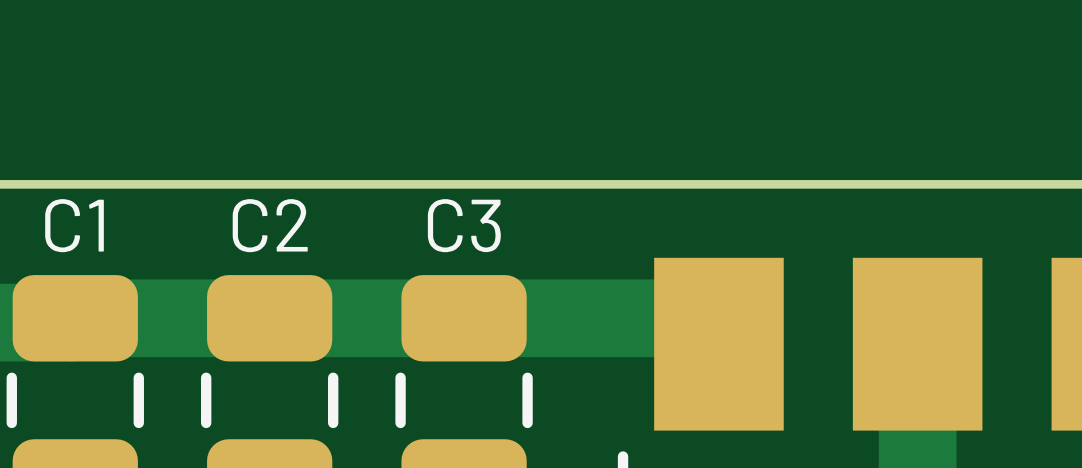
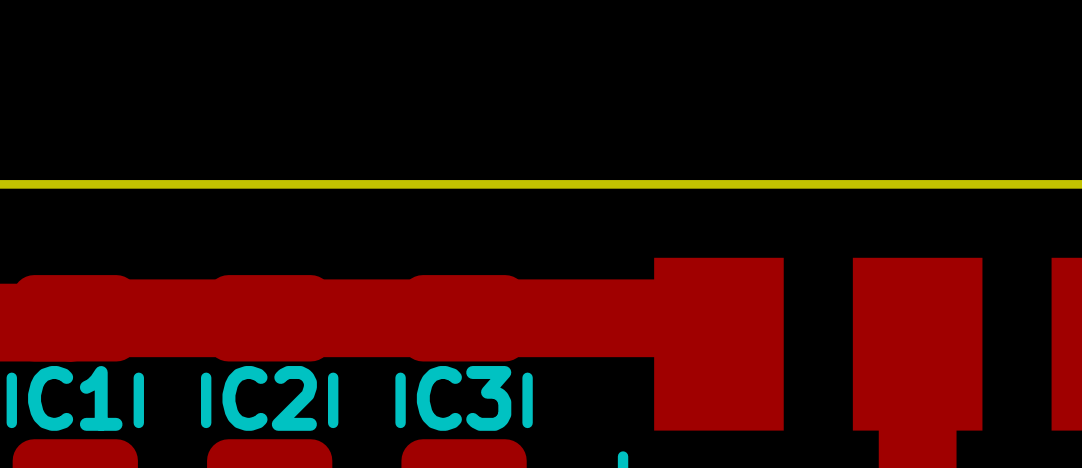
C1 name position: C1 (74, 225) -> C1 (75, 398)
C2 name position: C2 (270, 225) -> C2 (269, 398)
C3 name position: C3 (464, 225) -> C3 (464, 398)

